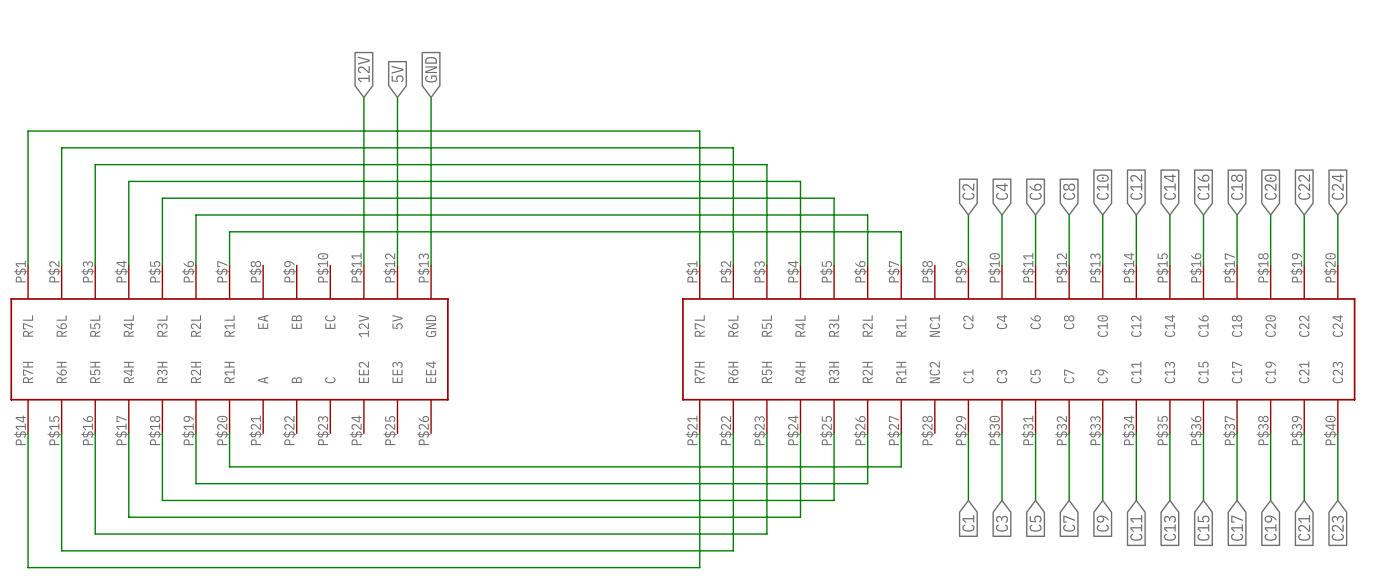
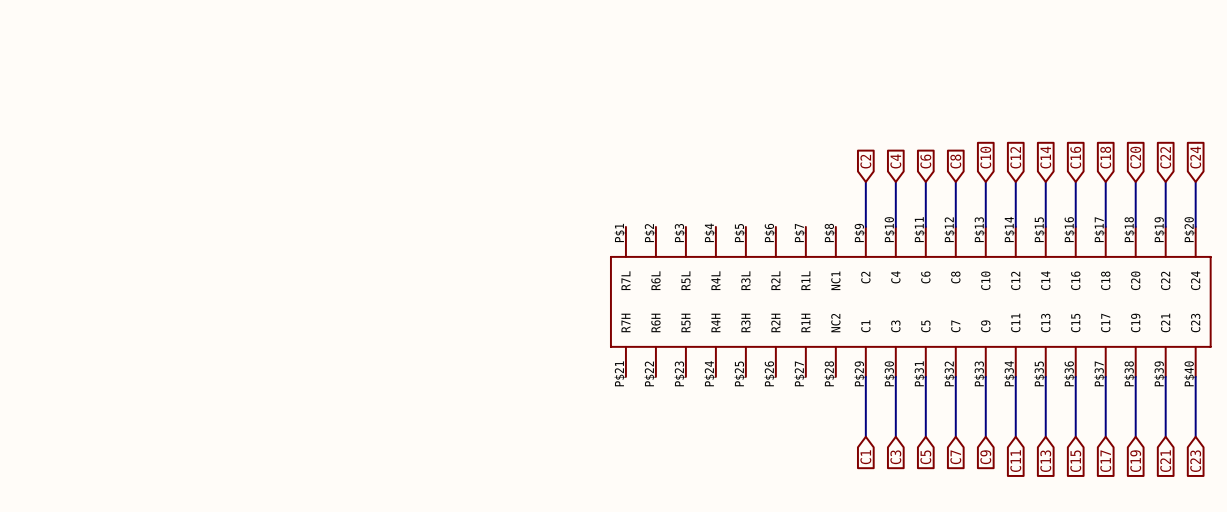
global label: 12V (363, 69) -> none
global label: GND (431, 69) -> none
global label: 5V (397, 73) -> none
wire: (363, 97) (363, 265) -> none
wire: (397, 97) (397, 265) -> none
wire: (431, 97) (431, 265) -> none
wire: (28, 265) (28, 131) (699, 131) (699, 265) -> none
wire: (61, 265) (61, 147) (733, 147) (733, 265) -> none
wire: (95, 265) (95, 164) (766, 164) (766, 265) -> none
wire: (128, 265) (128, 181) (800, 181) (800, 265) -> none
wire: (162, 265) (162, 198) (834, 198) (834, 265) -> none
wire: (195, 265) (195, 215) (867, 215) (867, 265) -> none
wire: (229, 265) (229, 231) (901, 231) (901, 265) -> none
part: (229, 349) -> none
wire: (28, 433) (28, 567) (699, 567) (699, 433) -> none
wire: (61, 433) (61, 550) (733, 550) (733, 433) -> none
wire: (95, 433) (95, 534) (766, 534) (766, 433) -> none
wire: (128, 433) (128, 517) (800, 517) (800, 433) -> none
wire: (162, 433) (162, 500) (834, 500) (834, 433) -> none
wire: (195, 433) (195, 483) (867, 483) (867, 433) -> none
wire: (229, 433) (229, 466) (901, 466) (901, 433) -> none

